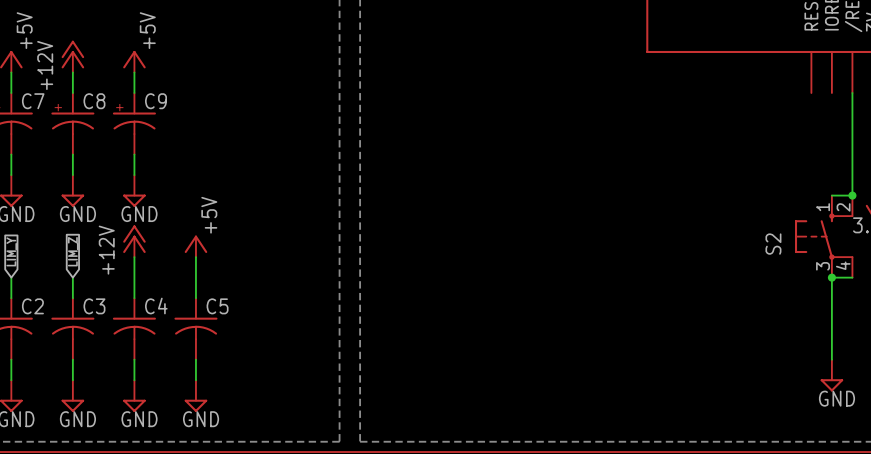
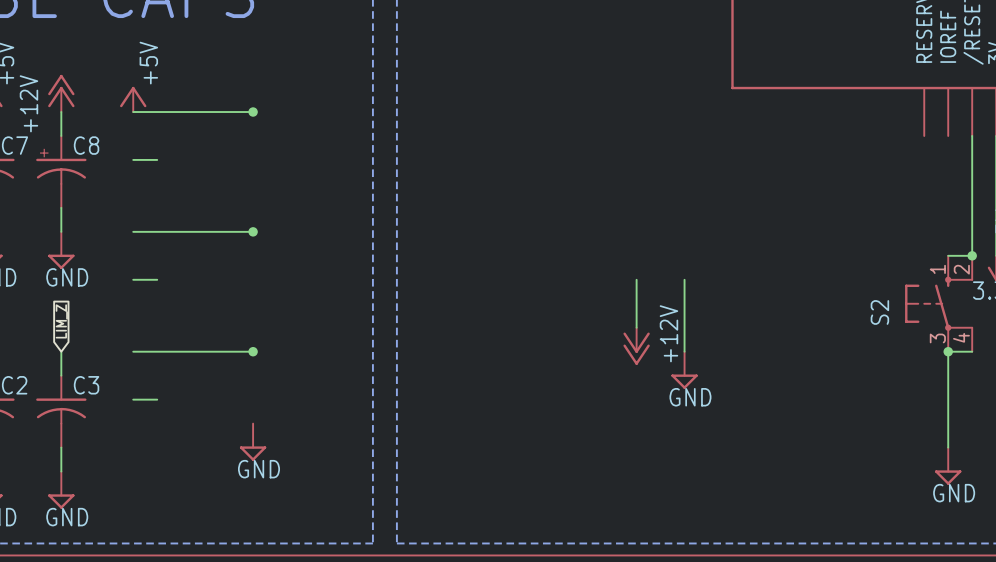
wire: (134, 72) (134, 93) -> (133, 112) (253, 112)
junction: none -> (253, 112)
C9: (134, 123) -> none
wire: (134, 154) (134, 175) -> (253, 231) (133, 231)
junction: none -> (253, 231)
power symbol: GND (134, 190) -> none
wire: none -> (133, 279) (157, 279)
wire: none -> (636, 279) (636, 327)
wire: none -> (684, 279) (684, 351)
power symbol: +12V (134, 241) -> none
power symbol: +5V (195, 246) -> none
wire: (134, 257) (134, 298) -> none
wire: (195, 257) (195, 298) -> none
power symbol: none -> +12V (636, 346)
wire: none -> (133, 351) (253, 351)
junction: none -> (253, 351)
power symbol: none -> GND (684, 370)
C4: (134, 328) -> none
C5: (195, 328) -> none
power symbol: none -> GND (253, 442)
wire: (134, 359) (134, 380) -> none
wire: (195, 359) (195, 380) -> none
power symbol: GND (134, 396) -> none
power symbol: GND (195, 396) -> none

